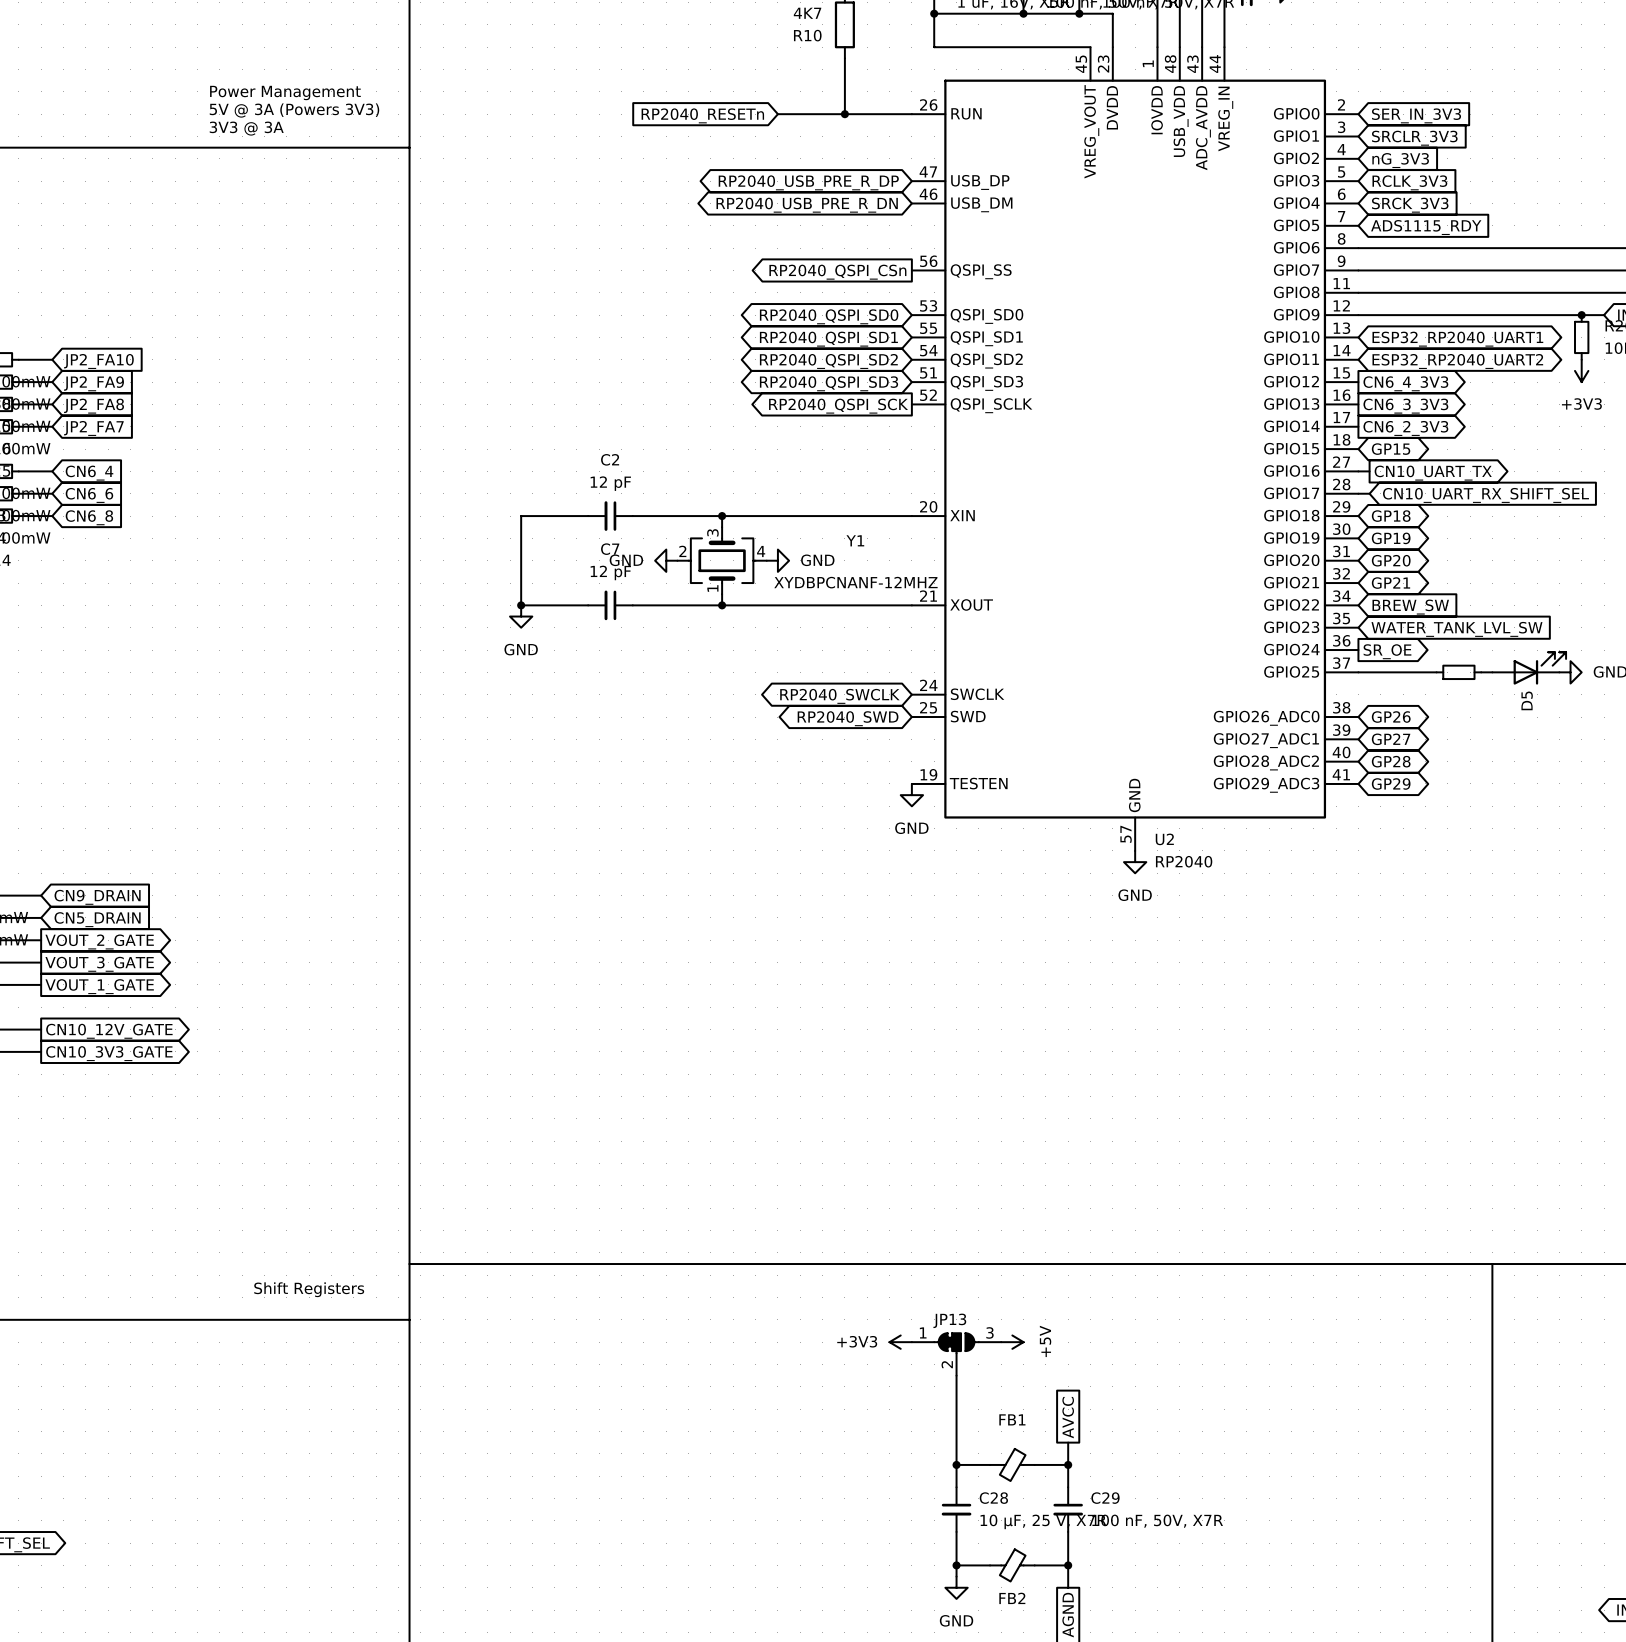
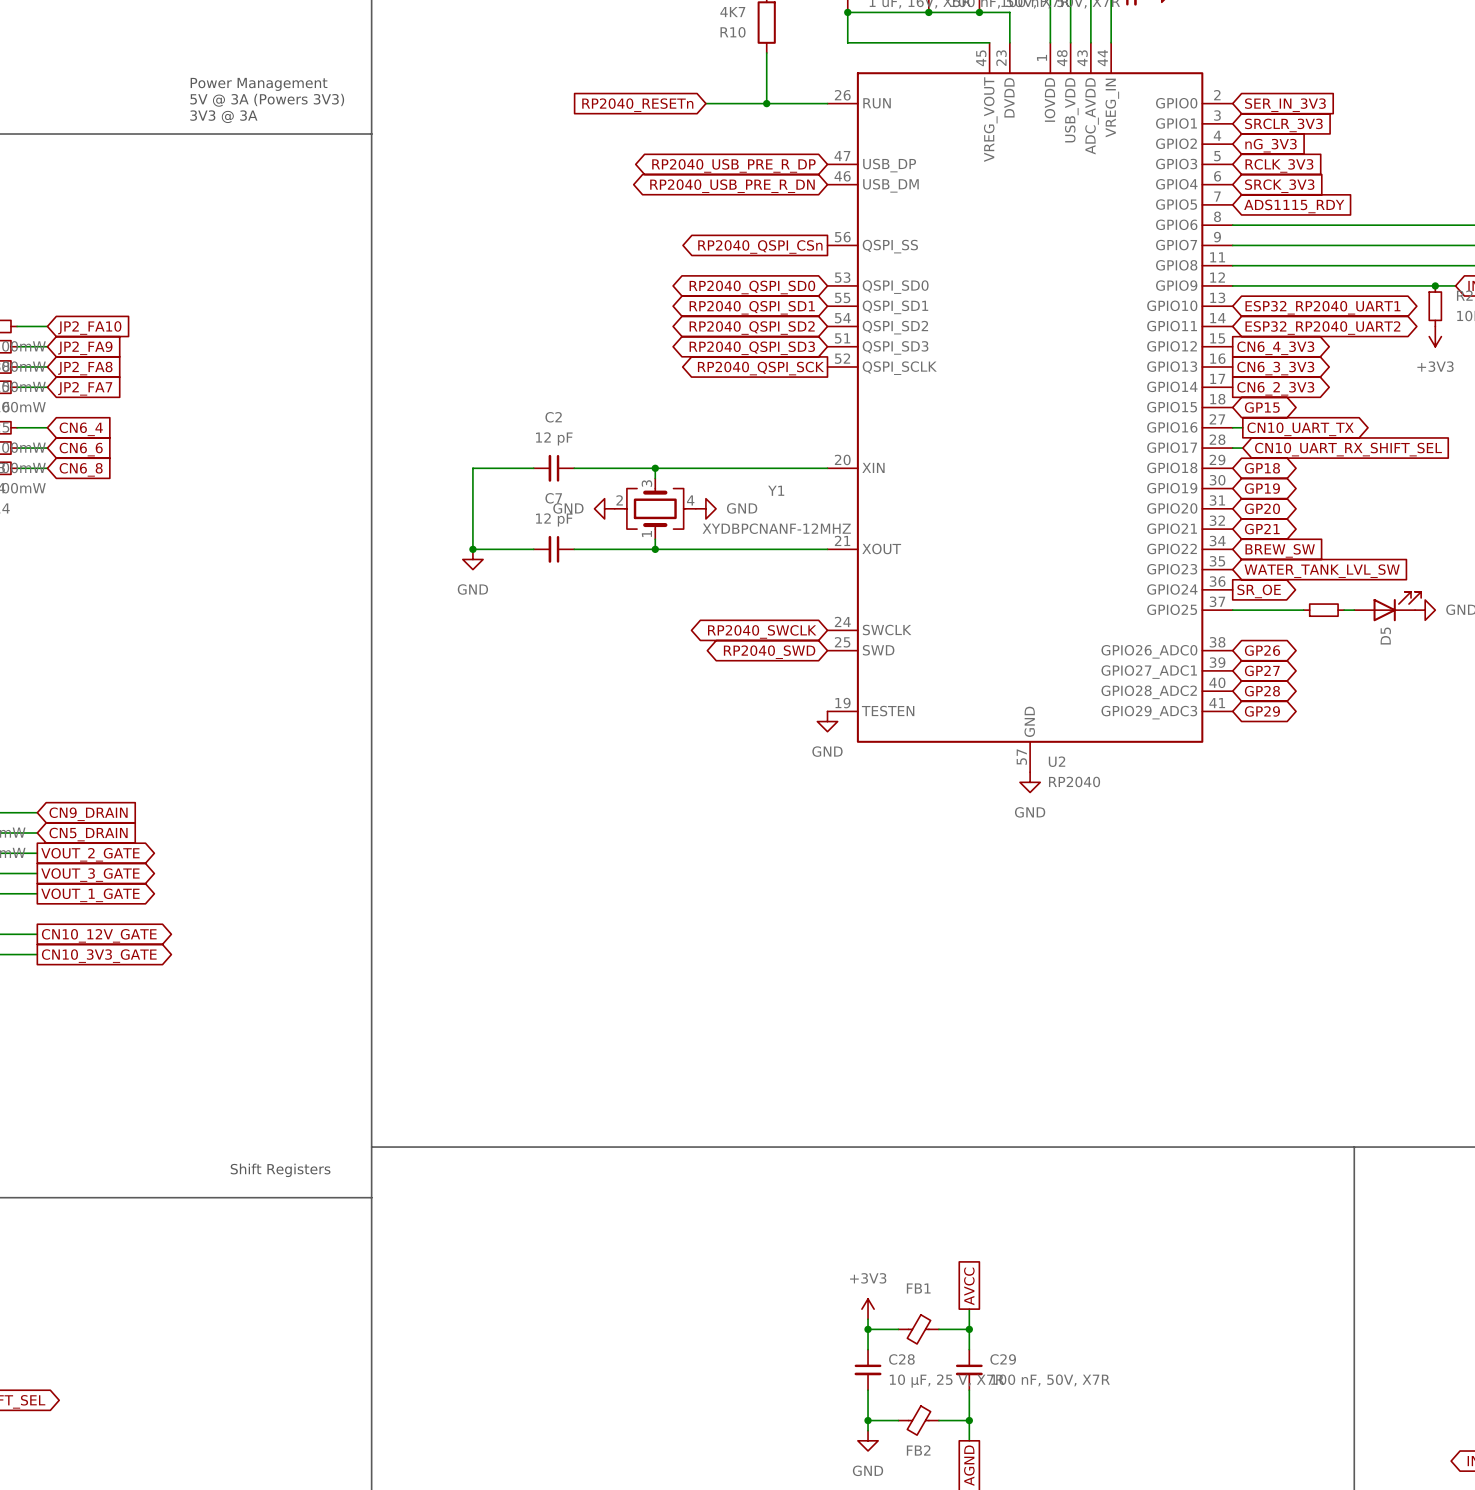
power symbol rotation: 0° (900, 1342) -> 90° clockwise (868, 1309)
power symbol position: +3V3 (900, 1342) -> +3V3 (868, 1309)
power symbol: +5V (1012, 1342) -> none
JP13: (956, 1354) -> none
wire: (956, 1375) (956, 1453) -> none

